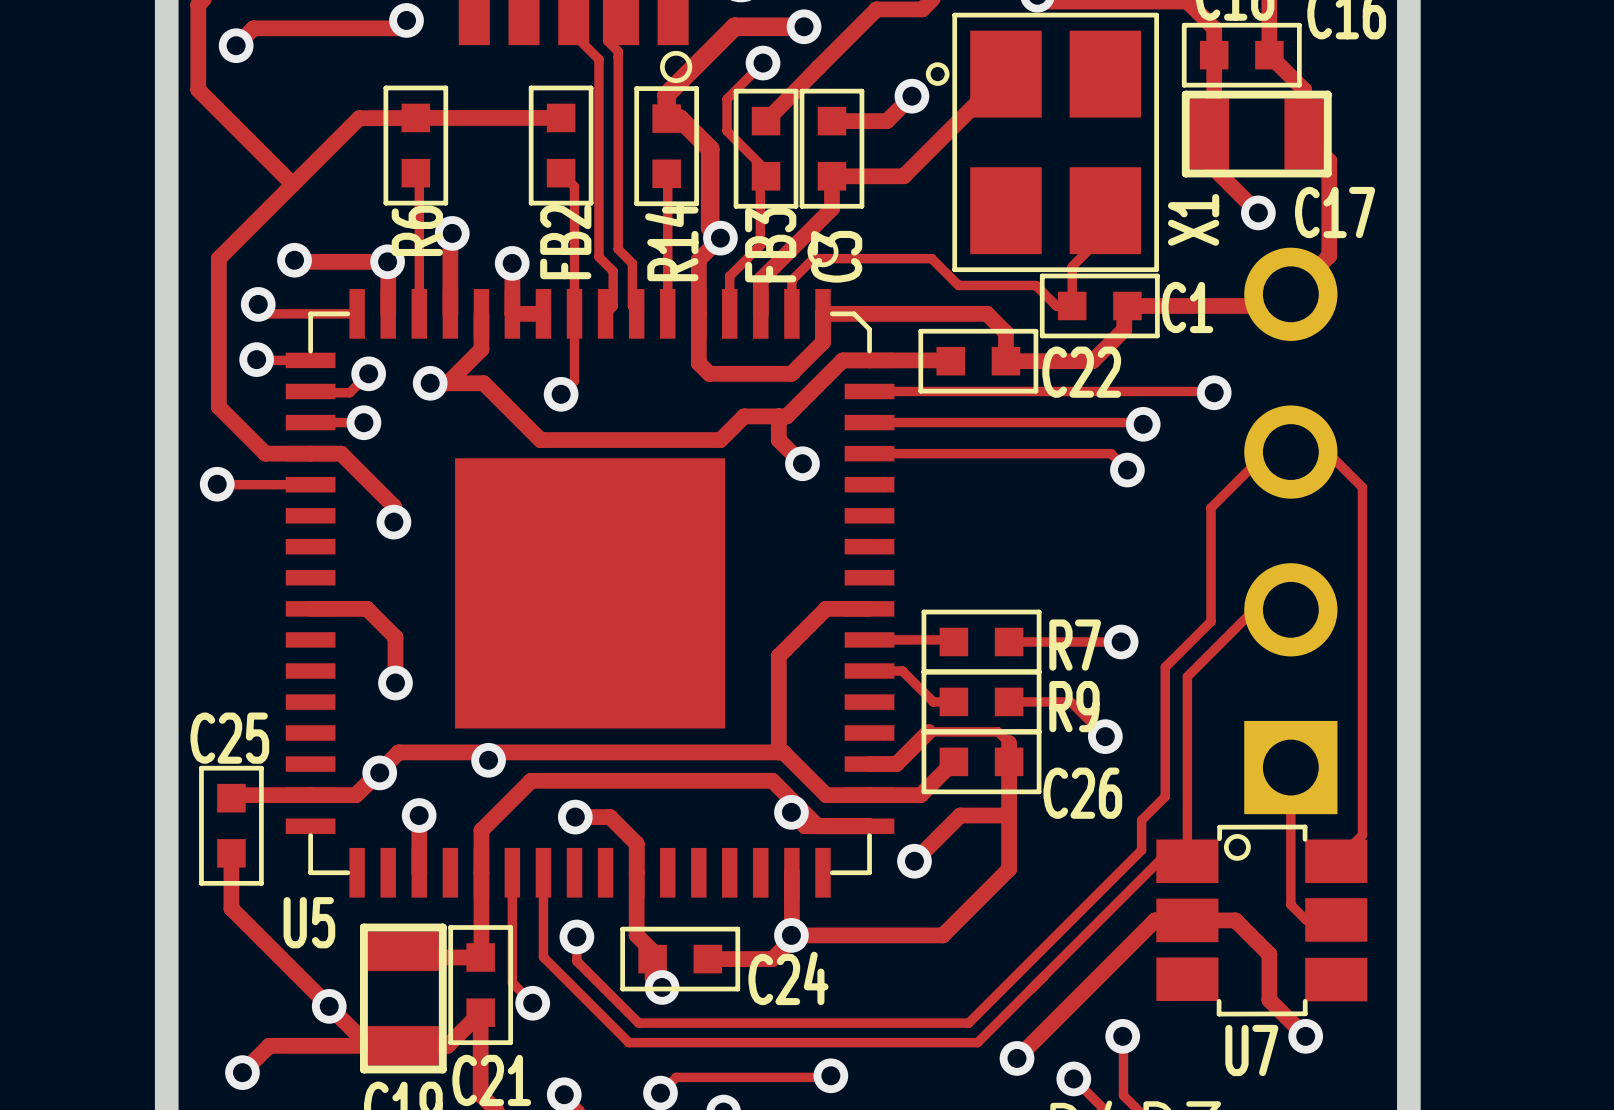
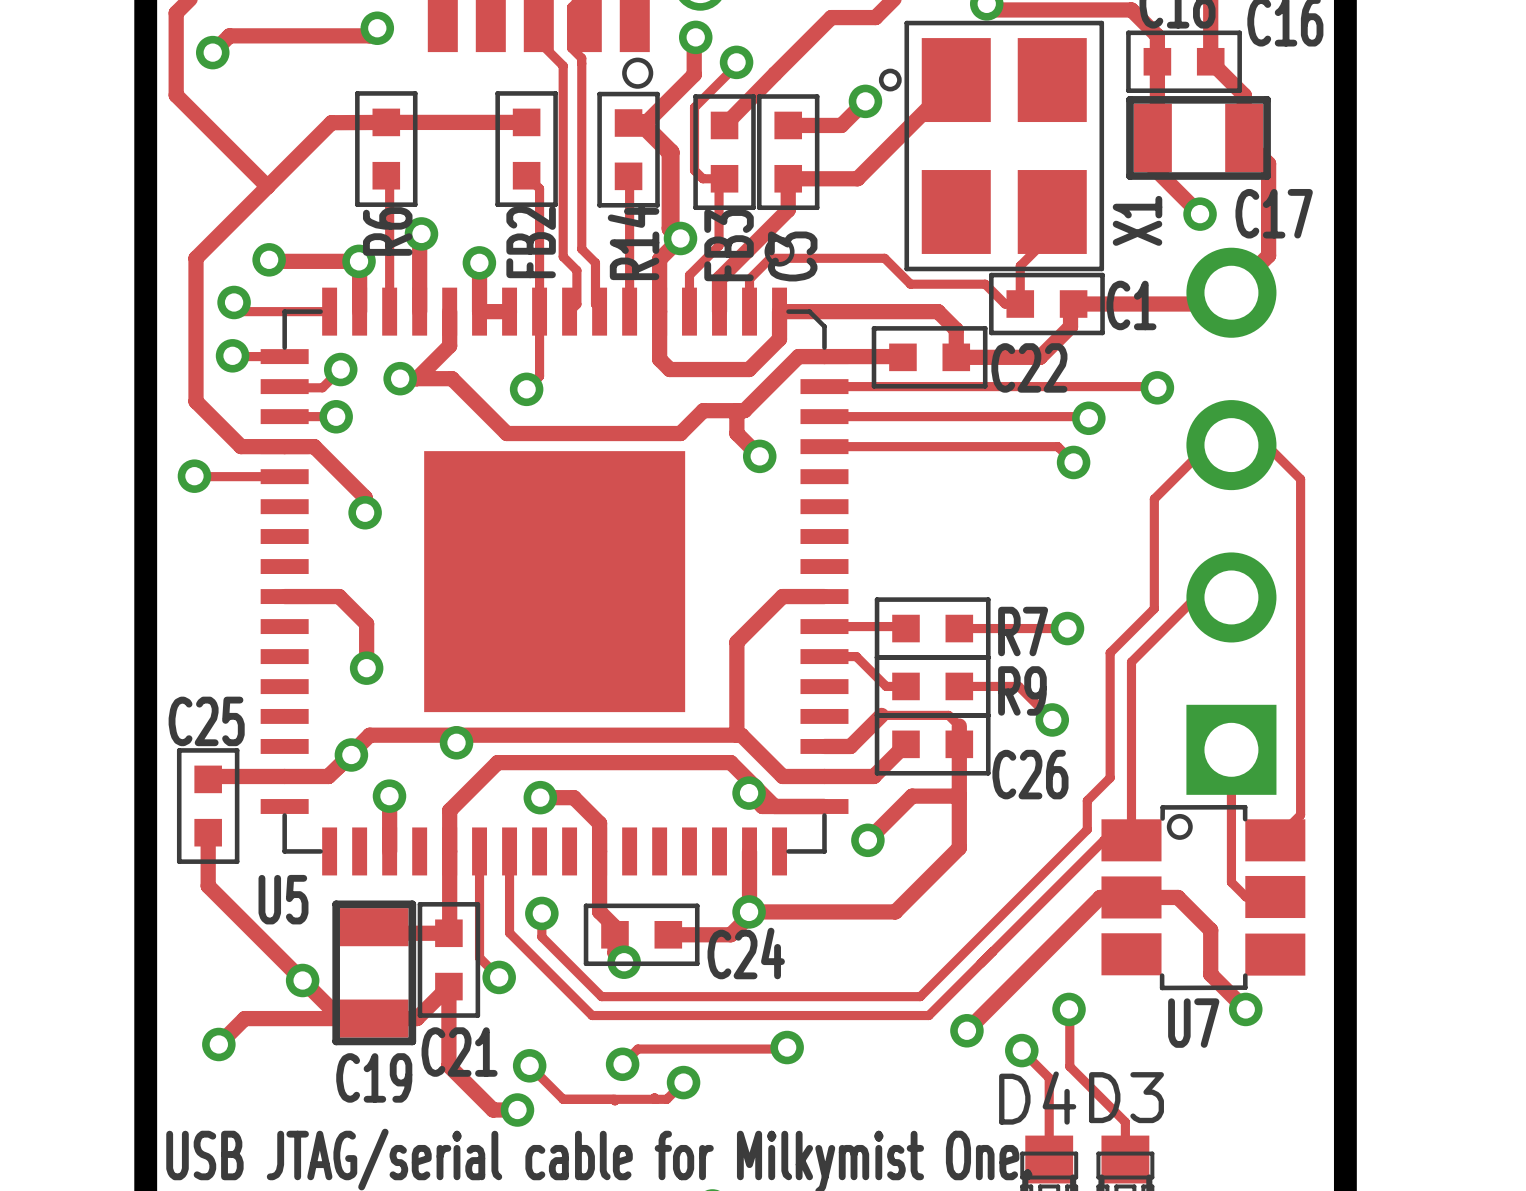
track: (804, 26) (734, 26) (666, 94) (666, 118) -> (695, 37) (694, 74) (645, 123) (628, 123)
via: (804, 26) -> none
via: none -> (695, 37)
track: (763, 63) (727, 99) (727, 131) (766, 170) (766, 176) -> (736, 62) (736, 65) (694, 107) (694, 170) (702, 178) (724, 178)
via position: (763, 63) -> (736, 62)

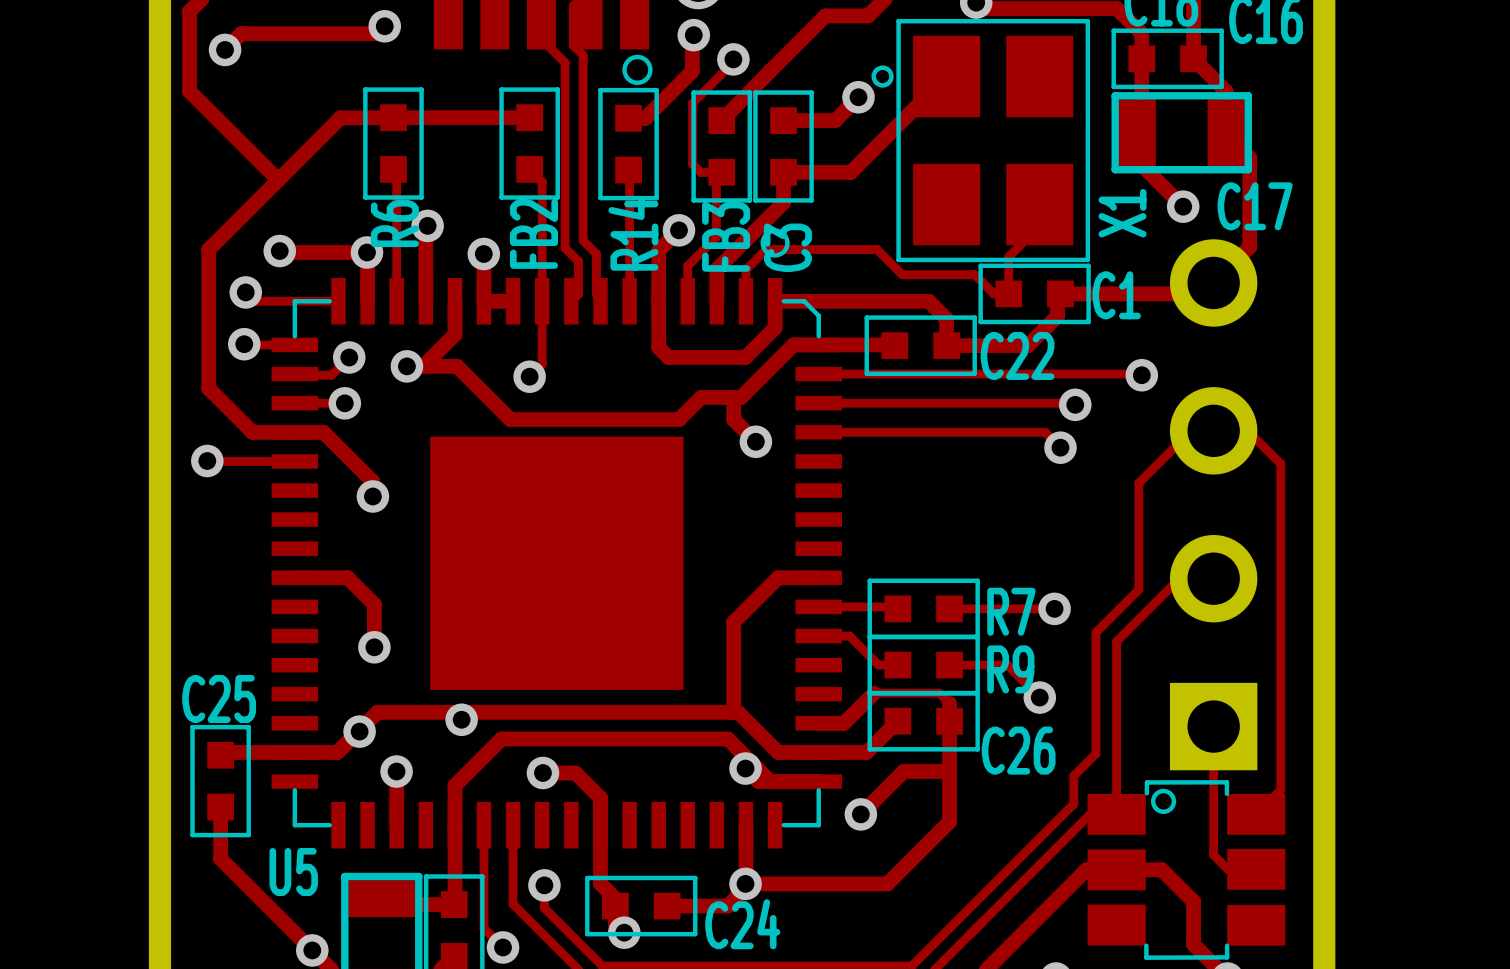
track: (628, 123) (641, 123) (670, 152) (670, 228) (680, 238) -> none

